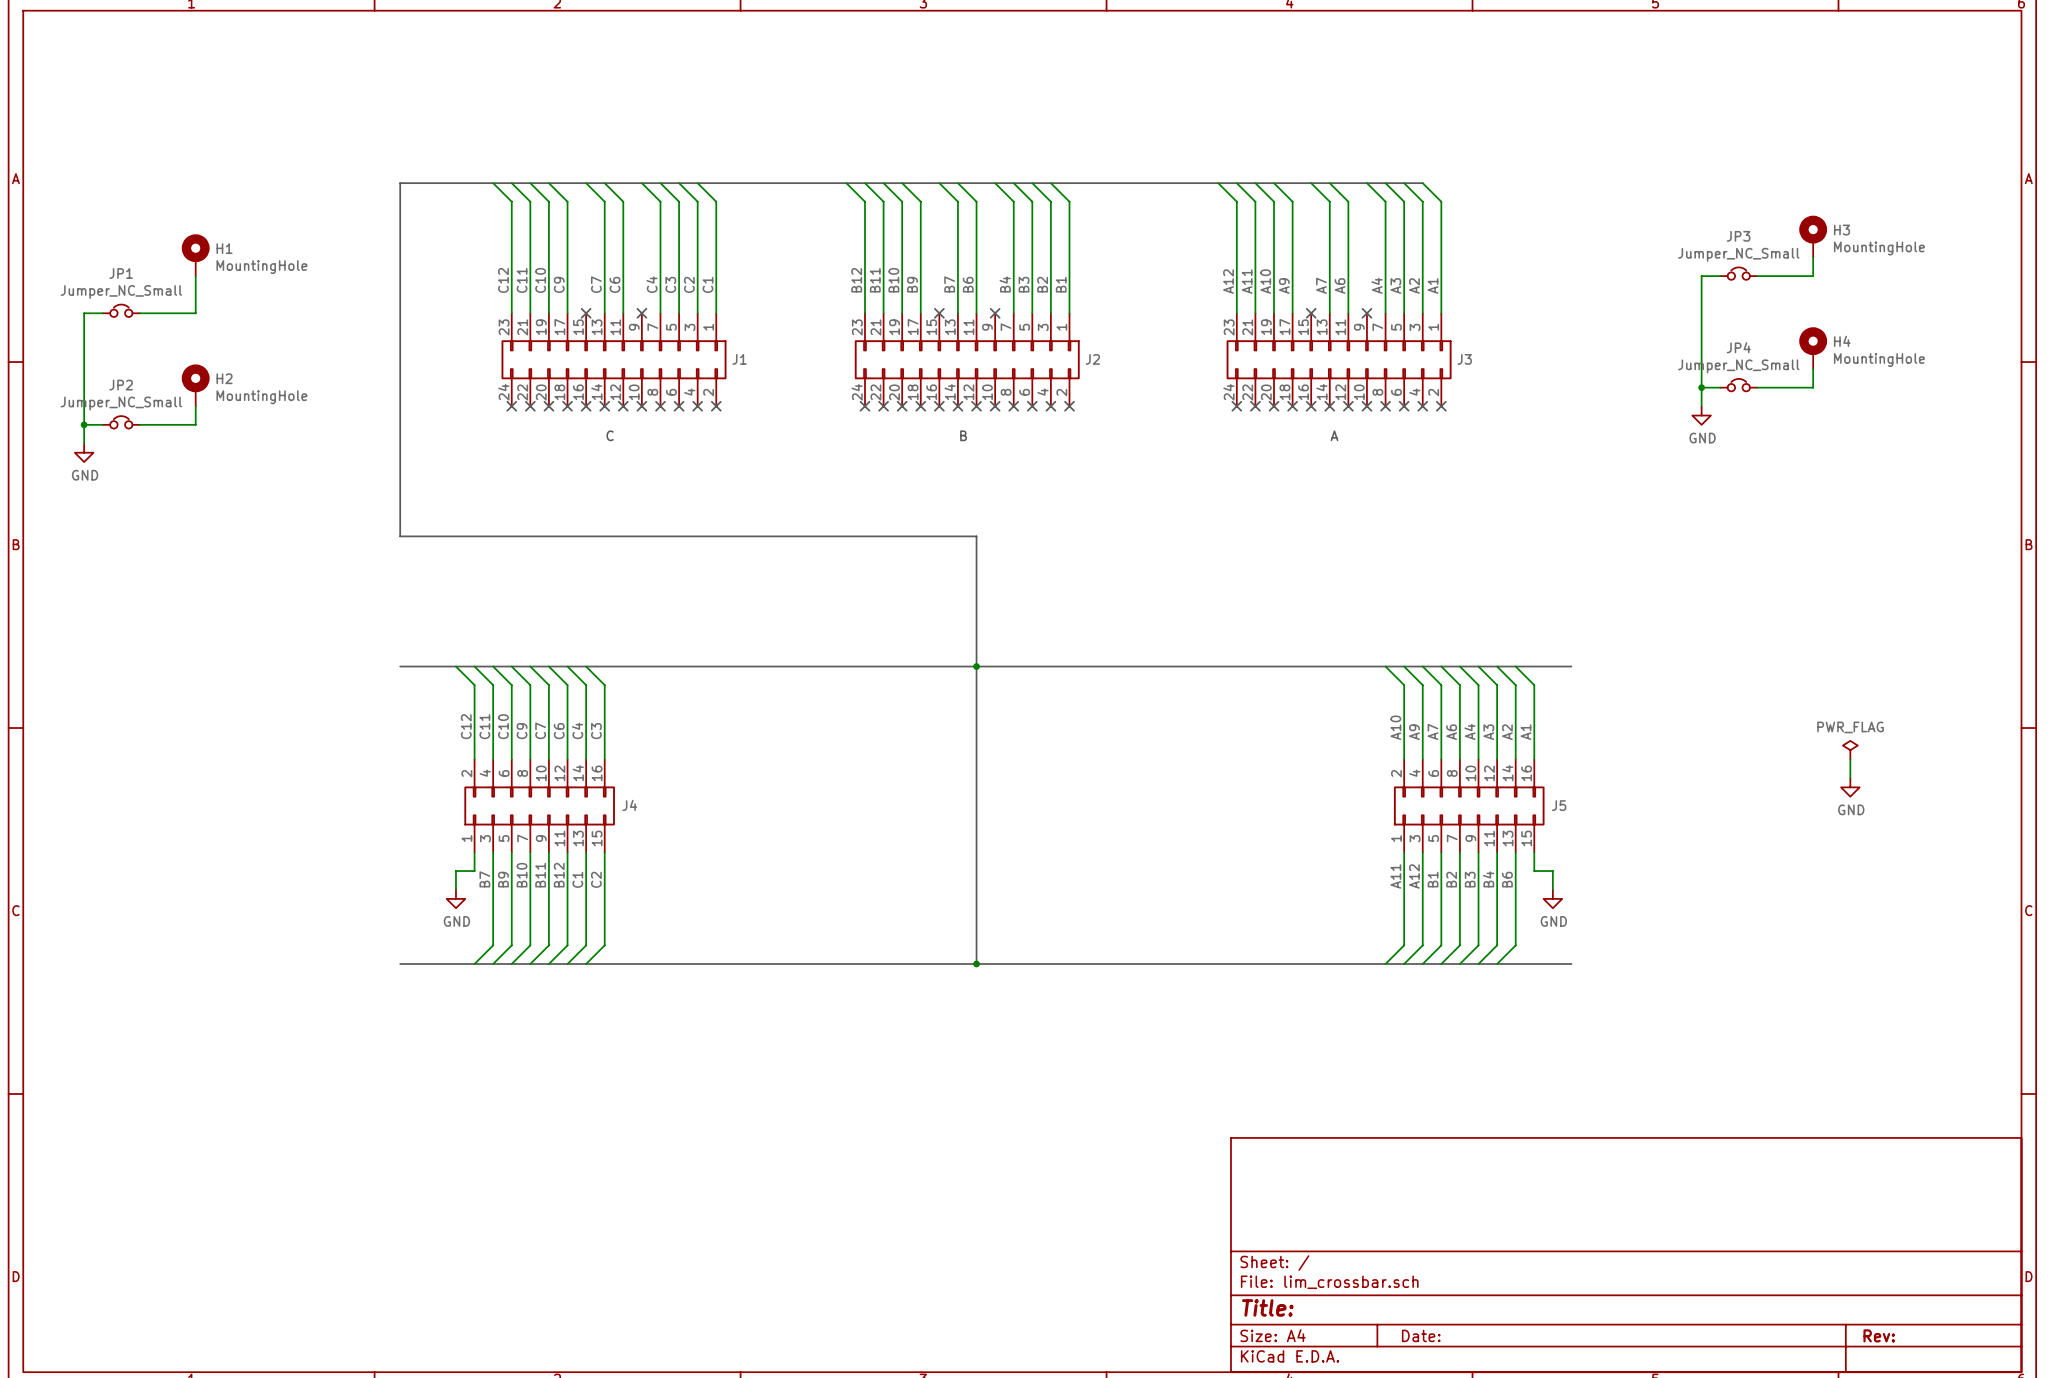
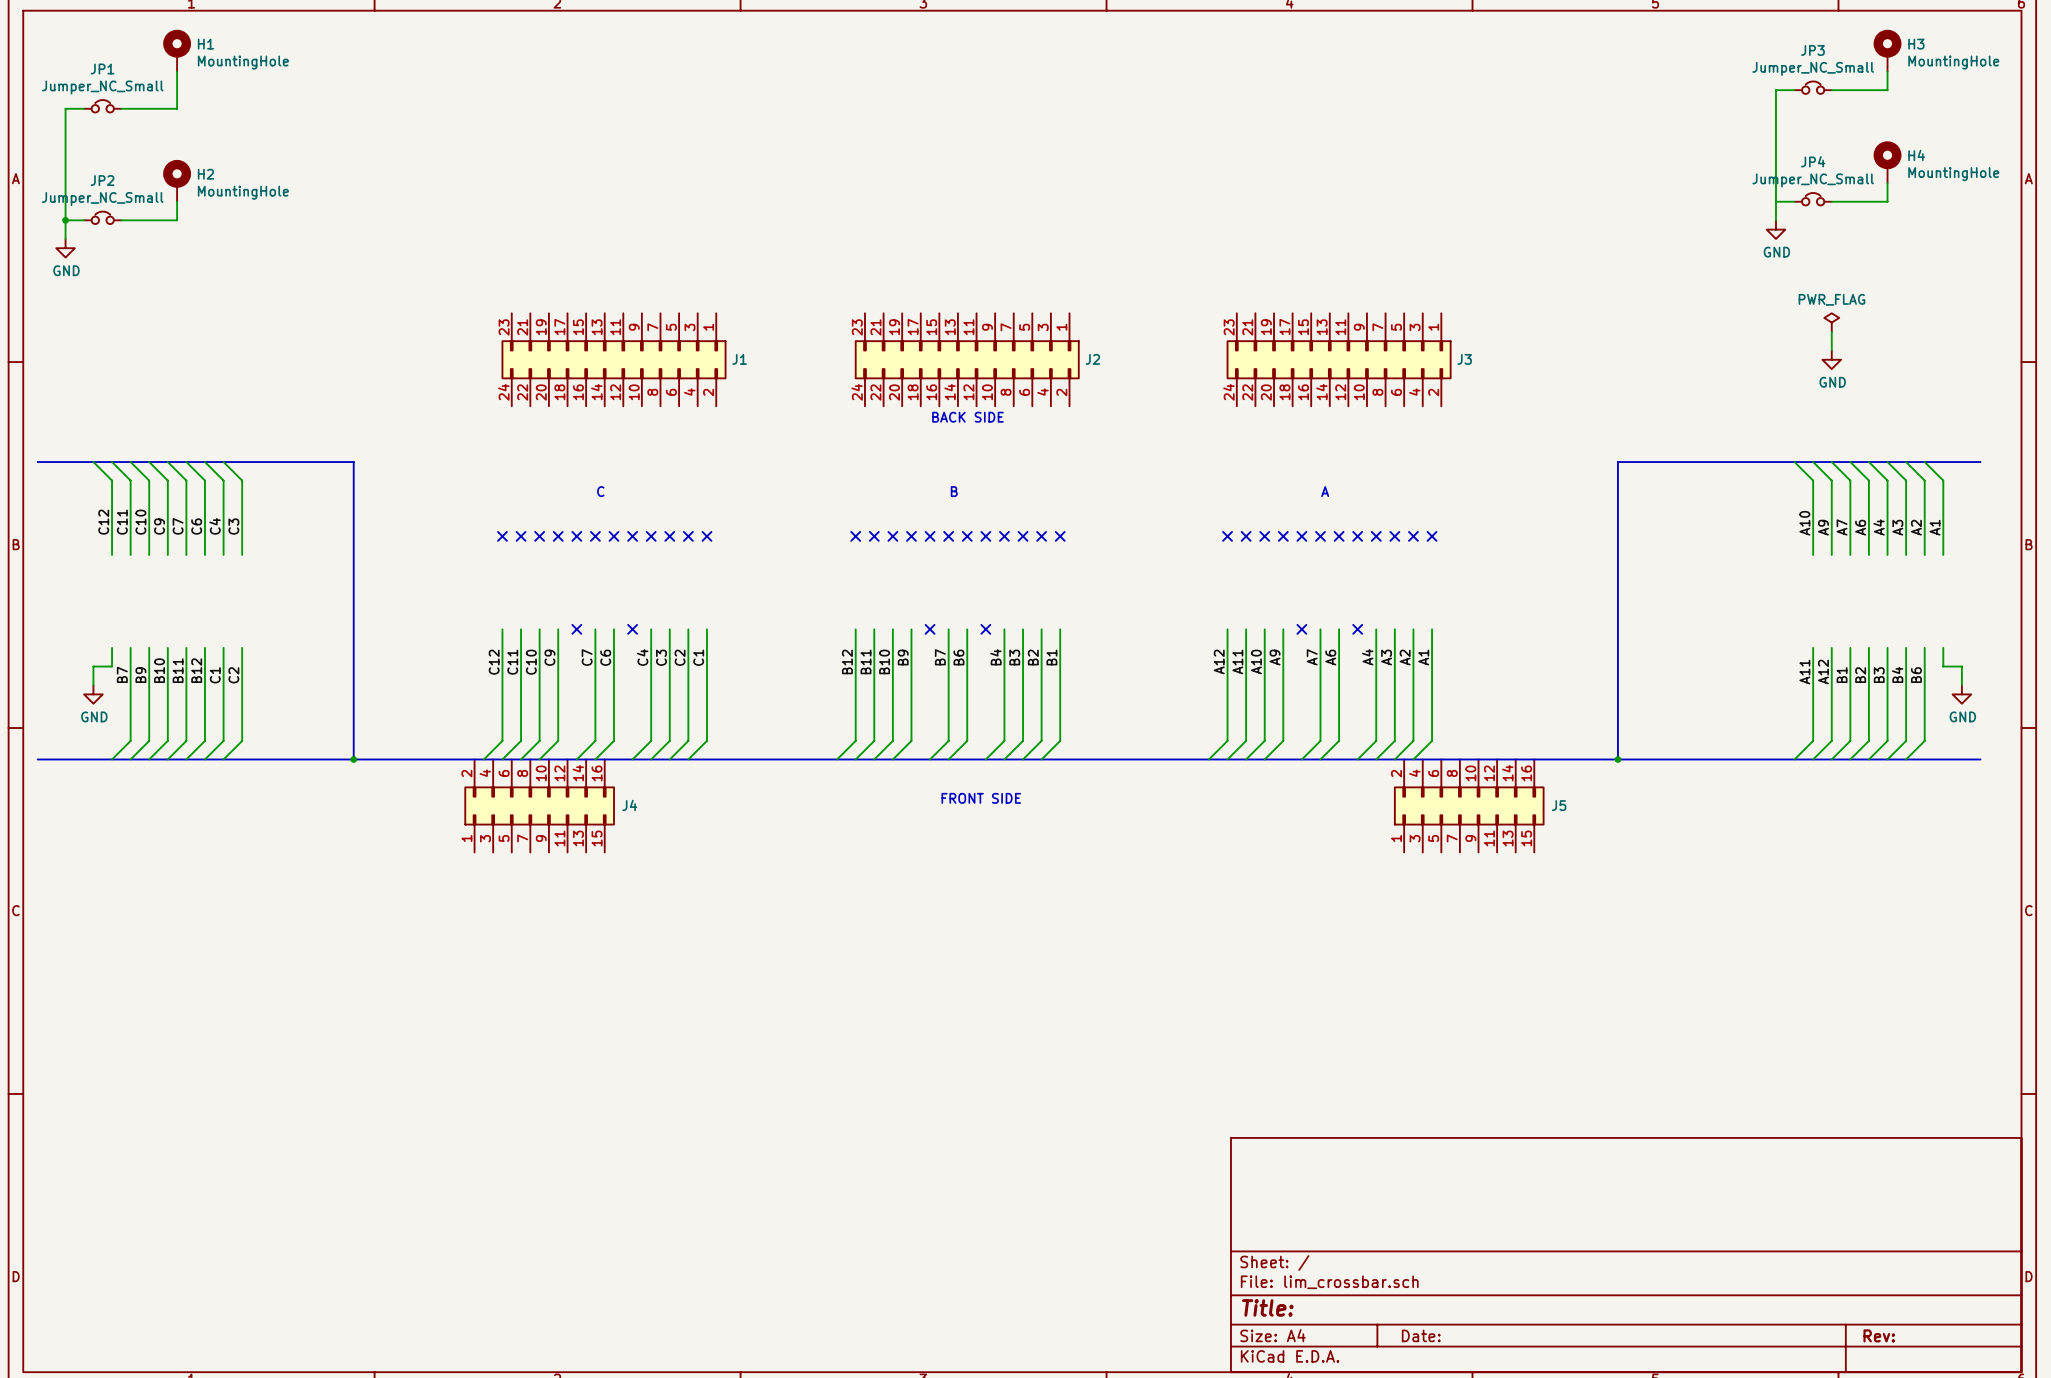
wire: none -> (177, 71) (177, 108) (121, 108)
wire: none -> (1887, 71) (1887, 90) (1831, 90)
wire: none -> (1794, 90) (1775, 90) (1775, 220)
wire: none -> (84, 108) (65, 108) (65, 238)
wire: (493, 183) (511, 201) (511, 313) -> none
wire: (511, 183) (530, 201) (530, 313) -> none
wire: (530, 183) (548, 201) (548, 313) -> none
wire: (548, 183) (567, 201) (567, 313) -> none
wire: (586, 183) (604, 201) (604, 313) -> none
wire: (604, 183) (623, 201) (623, 313) -> none
wire: (641, 183) (660, 201) (660, 313) -> none
wire: (660, 183) (679, 201) (679, 313) -> none
wire: (679, 183) (697, 201) (697, 313) -> none
wire: (697, 183) (716, 201) (716, 313) -> none
wire: (846, 183) (864, 201) (864, 313) -> none
wire: (864, 183) (883, 201) (883, 313) -> none
wire: (883, 183) (902, 201) (902, 313) -> none
wire: (902, 183) (920, 201) (920, 313) -> none
wire: (939, 183) (957, 201) (957, 313) -> none
wire: (957, 183) (976, 201) (976, 313) -> none
wire: (995, 183) (1013, 201) (1013, 313) -> none
wire: (1013, 183) (1032, 201) (1032, 313) -> none
wire: (1032, 183) (1050, 201) (1050, 313) -> none
wire: (1050, 183) (1069, 201) (1069, 313) -> none
wire: (1218, 183) (1236, 201) (1236, 313) -> none
wire: (1236, 183) (1255, 201) (1255, 313) -> none
wire: (1255, 183) (1274, 201) (1274, 313) -> none
wire: (1274, 183) (1292, 201) (1292, 313) -> none
wire: (1311, 183) (1329, 201) (1329, 313) -> none
wire: (1329, 183) (1348, 201) (1348, 313) -> none
wire: (1366, 183) (1385, 201) (1385, 313) -> none
wire: (1385, 183) (1404, 201) (1404, 313) -> none
wire: (1404, 183) (1422, 201) (1422, 313) -> none
bus: (1422, 183) (400, 183) (400, 536) (976, 536) (976, 963) -> none
wire: (1422, 183) (1441, 201) (1441, 313) -> none
wire: none -> (177, 201) (177, 220) (121, 220)
wire: none -> (1775, 201) (1794, 201)
wire: none -> (65, 220) (84, 220)
junction: none -> (65, 220)
power symbol: none -> GND (1775, 229)
H3 position: (1813, 236) -> (1887, 50)
power symbol: none -> GND (65, 248)
H1 position: (195, 255) -> (177, 50)
wire: (1813, 257) (1813, 276) (1757, 276) -> (1887, 183) (1887, 201) (1831, 201)
JP3 position: (1738, 273) -> (1813, 87)
wire: (195, 276) (195, 313) (139, 313) -> none
wire: (1720, 276) (1701, 276) (1701, 406) -> none
label: C12 (503, 280) -> none
label: C11 (522, 280) -> none
label: C10 (540, 280) -> none
label: B12 (856, 280) -> none
label: B11 (875, 280) -> none
label: B10 (893, 280) -> none
label: A12 (1228, 281) -> none
label: A11 (1247, 281) -> none
label: A10 (1265, 281) -> none
label: C9 (559, 284) -> none
label: C7 (596, 284) -> none
label: C6 (615, 284) -> none
label: C4 (651, 284) -> none
label: C3 (670, 284) -> none
label: C2 (689, 284) -> none
label: C1 (707, 284) -> none
label: B9 (912, 284) -> none
label: B7 (949, 284) -> none
label: B6 (968, 284) -> none
label: B4 (1005, 284) -> none
label: B3 (1024, 284) -> none
label: B2 (1042, 284) -> none
label: B1 (1061, 284) -> none
label: A9 (1284, 285) -> none
label: A7 (1321, 285) -> none
label: A6 (1340, 285) -> none
label: A4 (1377, 285) -> none
label: A3 (1395, 285) -> none
label: A2 (1414, 285) -> none
label: A1 (1433, 285) -> none
JP1 position: (121, 310) -> (102, 106)
wire: (102, 313) (84, 313) (84, 443) -> none
no-connect mark: (586, 313) -> none
no-connect mark: (641, 313) -> none
no-connect mark: (939, 313) -> none
no-connect mark: (995, 313) -> none
no-connect mark: (1311, 313) -> none
no-connect mark: (1366, 313) -> none
power symbol: none -> PWR_FLAG (1831, 322)
wire: none -> (1831, 331) (1831, 350)
H4 position: (1813, 348) -> (1887, 162)
power symbol: none -> GND (1831, 359)
wire: (1813, 369) (1813, 387) (1757, 387) -> none
H2 position: (195, 385) -> (177, 180)
JP4 position: (1738, 385) -> (1813, 199)
wire: (1701, 387) (1720, 387) -> none
junction: (1701, 387) -> none
wire: (195, 406) (195, 424) (139, 424) -> none
no-connect mark: (511, 406) -> none
no-connect mark: (530, 406) -> none
no-connect mark: (548, 406) -> none
no-connect mark: (567, 406) -> none
no-connect mark: (586, 406) -> none
no-connect mark: (604, 406) -> none
no-connect mark: (623, 406) -> none
no-connect mark: (641, 406) -> none
no-connect mark: (660, 406) -> none
no-connect mark: (679, 406) -> none
no-connect mark: (697, 406) -> none
no-connect mark: (716, 406) -> none
no-connect mark: (864, 406) -> none
no-connect mark: (883, 406) -> none
no-connect mark: (902, 406) -> none
no-connect mark: (920, 406) -> none
no-connect mark: (939, 406) -> none
no-connect mark: (957, 406) -> none
no-connect mark: (976, 406) -> none
no-connect mark: (995, 406) -> none
no-connect mark: (1013, 406) -> none
no-connect mark: (1032, 406) -> none
no-connect mark: (1050, 406) -> none
no-connect mark: (1069, 406) -> none
no-connect mark: (1236, 406) -> none
no-connect mark: (1255, 406) -> none
no-connect mark: (1274, 406) -> none
no-connect mark: (1292, 406) -> none
no-connect mark: (1311, 406) -> none
no-connect mark: (1329, 406) -> none
no-connect mark: (1348, 406) -> none
no-connect mark: (1366, 406) -> none
no-connect mark: (1385, 406) -> none
no-connect mark: (1404, 406) -> none
no-connect mark: (1422, 406) -> none
no-connect mark: (1441, 406) -> none
power symbol: GND (1701, 415) -> none
text: none -> BACK SIDE (967, 417)
JP2 position: (121, 422) -> (102, 217)
wire: (84, 424) (102, 424) -> none
junction: (84, 424) -> none
text position: C (610, 435) -> C (600, 491)
text position: B (963, 435) -> B (954, 491)
text position: A (1334, 435) -> A (1325, 491)
power symbol: GND (84, 452) -> none
bus: none -> (37, 462) (353, 462) (353, 759)
wire: none -> (93, 462) (112, 480) (112, 554)
wire: none -> (112, 462) (130, 480) (130, 554)
wire: none -> (130, 462) (149, 480) (149, 554)
wire: none -> (149, 462) (167, 480) (167, 554)
wire: none -> (167, 462) (186, 480) (186, 554)
wire: none -> (186, 462) (204, 480) (204, 554)
wire: none -> (204, 462) (223, 480) (223, 554)
wire: none -> (223, 462) (242, 480) (242, 554)
wire: none -> (1794, 462) (1813, 480) (1813, 554)
wire: none -> (1813, 462) (1831, 480) (1831, 554)
wire: none -> (1831, 462) (1850, 480) (1850, 554)
wire: none -> (1850, 462) (1868, 480) (1868, 554)
wire: none -> (1868, 462) (1887, 480) (1887, 554)
wire: none -> (1887, 462) (1906, 480) (1906, 554)
wire: none -> (1906, 462) (1924, 480) (1924, 554)
wire: none -> (1924, 462) (1943, 480) (1943, 554)
bus: none -> (1980, 462) (1617, 462) (1617, 759)
label: none -> C12 (103, 522)
label: none -> C11 (122, 522)
label: none -> C10 (140, 522)
label: none -> A10 (1804, 523)
label: none -> C9 (159, 526)
label: none -> C7 (178, 526)
label: none -> C6 (196, 526)
label: none -> C4 (215, 526)
label: none -> C3 (233, 526)
label: none -> A9 (1823, 527)
label: none -> A7 (1842, 527)
label: none -> A6 (1860, 527)
label: none -> A4 (1879, 527)
label: none -> A3 (1897, 527)
label: none -> A2 (1916, 527)
label: none -> A1 (1935, 527)
no-connect mark: none -> (502, 536)
no-connect mark: none -> (521, 536)
no-connect mark: none -> (539, 536)
no-connect mark: none -> (558, 536)
no-connect mark: none -> (576, 536)
no-connect mark: none -> (595, 536)
no-connect mark: none -> (614, 536)
no-connect mark: none -> (632, 536)
no-connect mark: none -> (651, 536)
no-connect mark: none -> (669, 536)
no-connect mark: none -> (688, 536)
no-connect mark: none -> (706, 536)
no-connect mark: none -> (855, 536)
no-connect mark: none -> (874, 536)
no-connect mark: none -> (892, 536)
no-connect mark: none -> (911, 536)
no-connect mark: none -> (930, 536)
no-connect mark: none -> (948, 536)
no-connect mark: none -> (967, 536)
no-connect mark: none -> (985, 536)
no-connect mark: none -> (1004, 536)
no-connect mark: none -> (1023, 536)
no-connect mark: none -> (1041, 536)
no-connect mark: none -> (1060, 536)
no-connect mark: none -> (1227, 536)
no-connect mark: none -> (1246, 536)
no-connect mark: none -> (1264, 536)
no-connect mark: none -> (1283, 536)
no-connect mark: none -> (1301, 536)
no-connect mark: none -> (1320, 536)
no-connect mark: none -> (1339, 536)
no-connect mark: none -> (1357, 536)
no-connect mark: none -> (1376, 536)
no-connect mark: none -> (1394, 536)
no-connect mark: none -> (1413, 536)
no-connect mark: none -> (1432, 536)
wire: none -> (502, 629) (502, 740) (483, 759)
wire: none -> (521, 629) (521, 740) (502, 759)
wire: none -> (539, 629) (539, 740) (521, 759)
wire: none -> (558, 629) (558, 740) (539, 759)
no-connect mark: none -> (576, 629)
wire: none -> (595, 629) (595, 740) (576, 759)
wire: none -> (614, 629) (614, 740) (595, 759)
no-connect mark: none -> (632, 629)
wire: none -> (651, 629) (651, 740) (632, 759)
wire: none -> (669, 629) (669, 740) (651, 759)
wire: none -> (688, 629) (688, 740) (669, 759)
wire: none -> (706, 629) (706, 740) (688, 759)
wire: none -> (855, 629) (855, 740) (837, 759)
wire: none -> (874, 629) (874, 740) (855, 759)
wire: none -> (892, 629) (892, 740) (874, 759)
wire: none -> (911, 629) (911, 740) (892, 759)
no-connect mark: none -> (930, 629)
wire: none -> (948, 629) (948, 740) (930, 759)
wire: none -> (967, 629) (967, 740) (948, 759)
no-connect mark: none -> (985, 629)
wire: none -> (1004, 629) (1004, 740) (985, 759)
wire: none -> (1023, 629) (1023, 740) (1004, 759)
wire: none -> (1041, 629) (1041, 740) (1023, 759)
wire: none -> (1060, 629) (1060, 740) (1041, 759)
wire: none -> (1227, 629) (1227, 740) (1208, 759)
wire: none -> (1246, 629) (1246, 740) (1227, 759)
wire: none -> (1264, 629) (1264, 740) (1246, 759)
wire: none -> (1283, 629) (1283, 740) (1264, 759)
no-connect mark: none -> (1301, 629)
wire: none -> (1320, 629) (1320, 740) (1301, 759)
wire: none -> (1339, 629) (1339, 740) (1320, 759)
no-connect mark: none -> (1357, 629)
wire: none -> (1376, 629) (1376, 740) (1357, 759)
wire: none -> (1394, 629) (1394, 740) (1376, 759)
wire: none -> (1413, 629) (1413, 740) (1394, 759)
wire: none -> (1432, 629) (1432, 740) (1413, 759)
wire: none -> (112, 647) (112, 666) (93, 666) (93, 685)
wire: none -> (130, 647) (130, 740) (112, 759)
wire: none -> (149, 647) (149, 740) (130, 759)
wire: none -> (167, 647) (167, 740) (149, 759)
wire: none -> (186, 647) (186, 740) (167, 759)
wire: none -> (204, 647) (204, 740) (186, 759)
wire: none -> (223, 647) (223, 740) (204, 759)
wire: none -> (242, 647) (242, 740) (223, 759)
wire: none -> (1813, 647) (1813, 740) (1794, 759)
wire: none -> (1831, 647) (1831, 740) (1813, 759)
wire: none -> (1850, 647) (1850, 740) (1831, 759)
wire: none -> (1887, 647) (1887, 740) (1868, 759)
wire: none -> (1906, 647) (1906, 740) (1887, 759)
wire: none -> (1924, 647) (1924, 740) (1906, 759)
wire: none -> (1943, 647) (1943, 666) (1961, 666) (1961, 685)
label: none -> C2 (680, 657)
label: none -> C1 (698, 657)
label: none -> B9 (903, 657)
label: none -> B7 (940, 657)
label: none -> B6 (958, 657)
label: none -> B4 (995, 657)
label: none -> B3 (1014, 657)
label: none -> B2 (1033, 657)
label: none -> B1 (1051, 657)
label: none -> B12 (847, 661)
label: none -> B11 (865, 661)
label: none -> B10 (884, 661)
label: none -> A12 (1219, 661)
label: none -> A11 (1237, 661)
bus: (400, 666) (1571, 666) -> none
wire: (455, 666) (474, 685) (474, 759) -> none
wire: (474, 666) (493, 685) (493, 759) -> none
wire: (493, 666) (511, 685) (511, 759) -> none
wire: (511, 666) (530, 685) (530, 759) -> none
wire: (530, 666) (548, 685) (548, 759) -> none
wire: (548, 666) (567, 685) (567, 759) -> none
wire: (567, 666) (586, 685) (586, 759) -> none
wire: (586, 666) (604, 685) (604, 759) -> none
junction: (976, 666) -> none
wire: (1385, 666) (1404, 685) (1404, 759) -> none
wire: (1404, 666) (1422, 685) (1422, 759) -> none
wire: (1422, 666) (1441, 685) (1441, 759) -> none
wire: (1441, 666) (1459, 685) (1459, 759) -> none
wire: (1459, 666) (1478, 685) (1478, 759) -> none
wire: (1478, 666) (1497, 685) (1497, 759) -> none
wire: (1497, 666) (1515, 685) (1515, 759) -> none
wire: (1515, 666) (1534, 685) (1534, 759) -> none
label: none -> B10 (159, 670)
label: none -> B11 (178, 670)
label: none -> B12 (196, 670)
label: none -> A11 (1804, 671)
label: none -> A12 (1823, 671)
label: none -> B7 (122, 674)
label: none -> B4 (1897, 674)
label: none -> B9 (140, 675)
label: none -> C1 (215, 675)
label: none -> C2 (233, 675)
label: none -> B1 (1842, 675)
label: none -> B2 (1860, 675)
label: none -> B3 (1879, 675)
label: none -> B6 (1916, 675)
power symbol: none -> GND (93, 694)
label position: C12 (466, 726) -> C12 (494, 662)
label position: C11 (484, 726) -> C11 (512, 662)
label position: C10 (503, 726) -> C10 (531, 662)
label position: A10 (1395, 727) -> A10 (1256, 661)
label position: C7 (540, 730) -> C7 (587, 657)
label position: C4 (577, 730) -> C4 (642, 657)
label position: C9 (522, 731) -> C9 (549, 657)
label position: C6 (559, 731) -> C6 (605, 657)
label position: C3 (596, 731) -> C3 (661, 657)
label position: A7 (1433, 731) -> A7 (1312, 657)
label position: A4 (1470, 731) -> A4 (1367, 657)
label position: A9 (1414, 732) -> A9 (1275, 657)
label position: A6 (1451, 732) -> A6 (1330, 657)
label position: A3 (1488, 732) -> A3 (1386, 657)
label position: A2 (1507, 732) -> A2 (1405, 657)
label position: A1 (1525, 732) -> A1 (1423, 657)
power symbol: PWR_FLAG (1850, 750) -> none
bus: none -> (37, 759) (1980, 759)
junction: none -> (353, 759)
junction: none -> (1617, 759)
wire: (1850, 759) (1850, 778) -> (1850, 759) (1868, 740) (1868, 647)
power symbol position: GND (1850, 787) -> GND (1961, 694)
text: none -> FRONT SIDE (981, 798)
wire: (474, 852) (474, 871) (455, 871) (455, 889) -> none
wire: (493, 852) (493, 945) (474, 963) -> none
wire: (511, 852) (511, 945) (493, 963) -> none
wire: (530, 852) (530, 945) (511, 963) -> none
wire: (548, 852) (548, 945) (530, 963) -> none
wire: (567, 852) (567, 945) (548, 963) -> none
wire: (586, 852) (586, 945) (567, 963) -> none
wire: (604, 852) (604, 945) (586, 963) -> none
wire: (1404, 852) (1404, 945) (1385, 963) -> none
wire: (1422, 852) (1422, 945) (1404, 963) -> none
wire: (1441, 852) (1441, 945) (1422, 963) -> none
wire: (1459, 852) (1459, 945) (1441, 963) -> none
wire: (1478, 852) (1478, 945) (1459, 963) -> none
wire: (1497, 852) (1497, 945) (1478, 963) -> none
wire: (1515, 852) (1515, 945) (1497, 963) -> none
wire: (1534, 852) (1534, 871) (1552, 871) (1552, 889) -> none
label: B10 (522, 875) -> none
label: B11 (540, 875) -> none
label: B12 (559, 875) -> none
label: A11 (1395, 876) -> none
label: A12 (1414, 876) -> none
label: B7 (484, 879) -> none
label: B9 (503, 879) -> none
label: C1 (577, 879) -> none
label: C2 (596, 879) -> none
label: B1 (1433, 879) -> none
label: B2 (1451, 879) -> none
label: B3 (1470, 879) -> none
label: B4 (1488, 879) -> none
label: B6 (1507, 879) -> none
power symbol: GND (455, 898) -> none
power symbol: GND (1552, 898) -> none
bus: (400, 963) (1571, 963) -> none
junction: (976, 963) -> none

